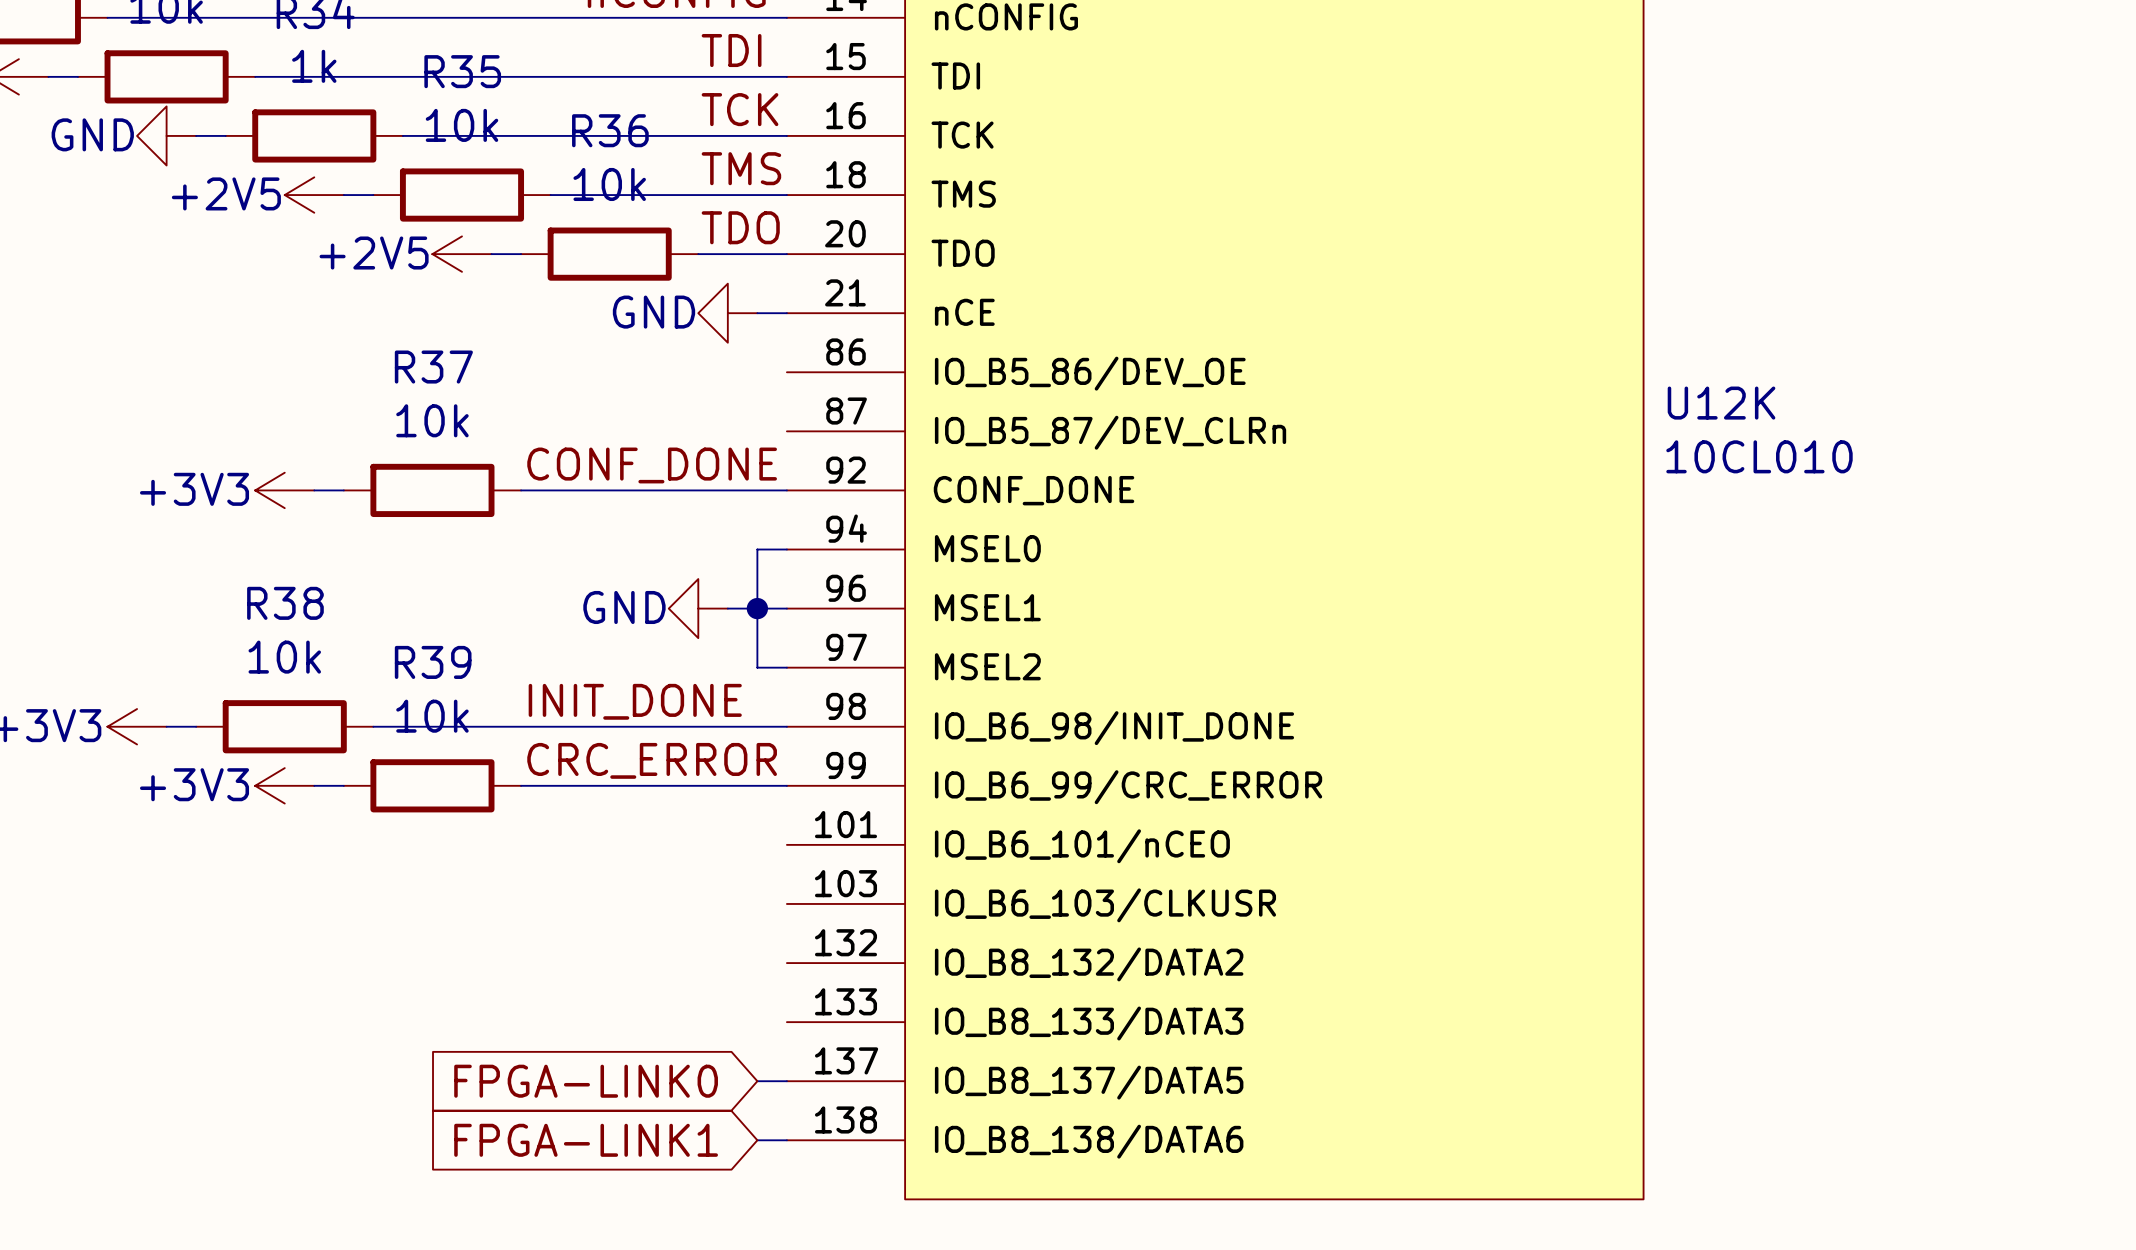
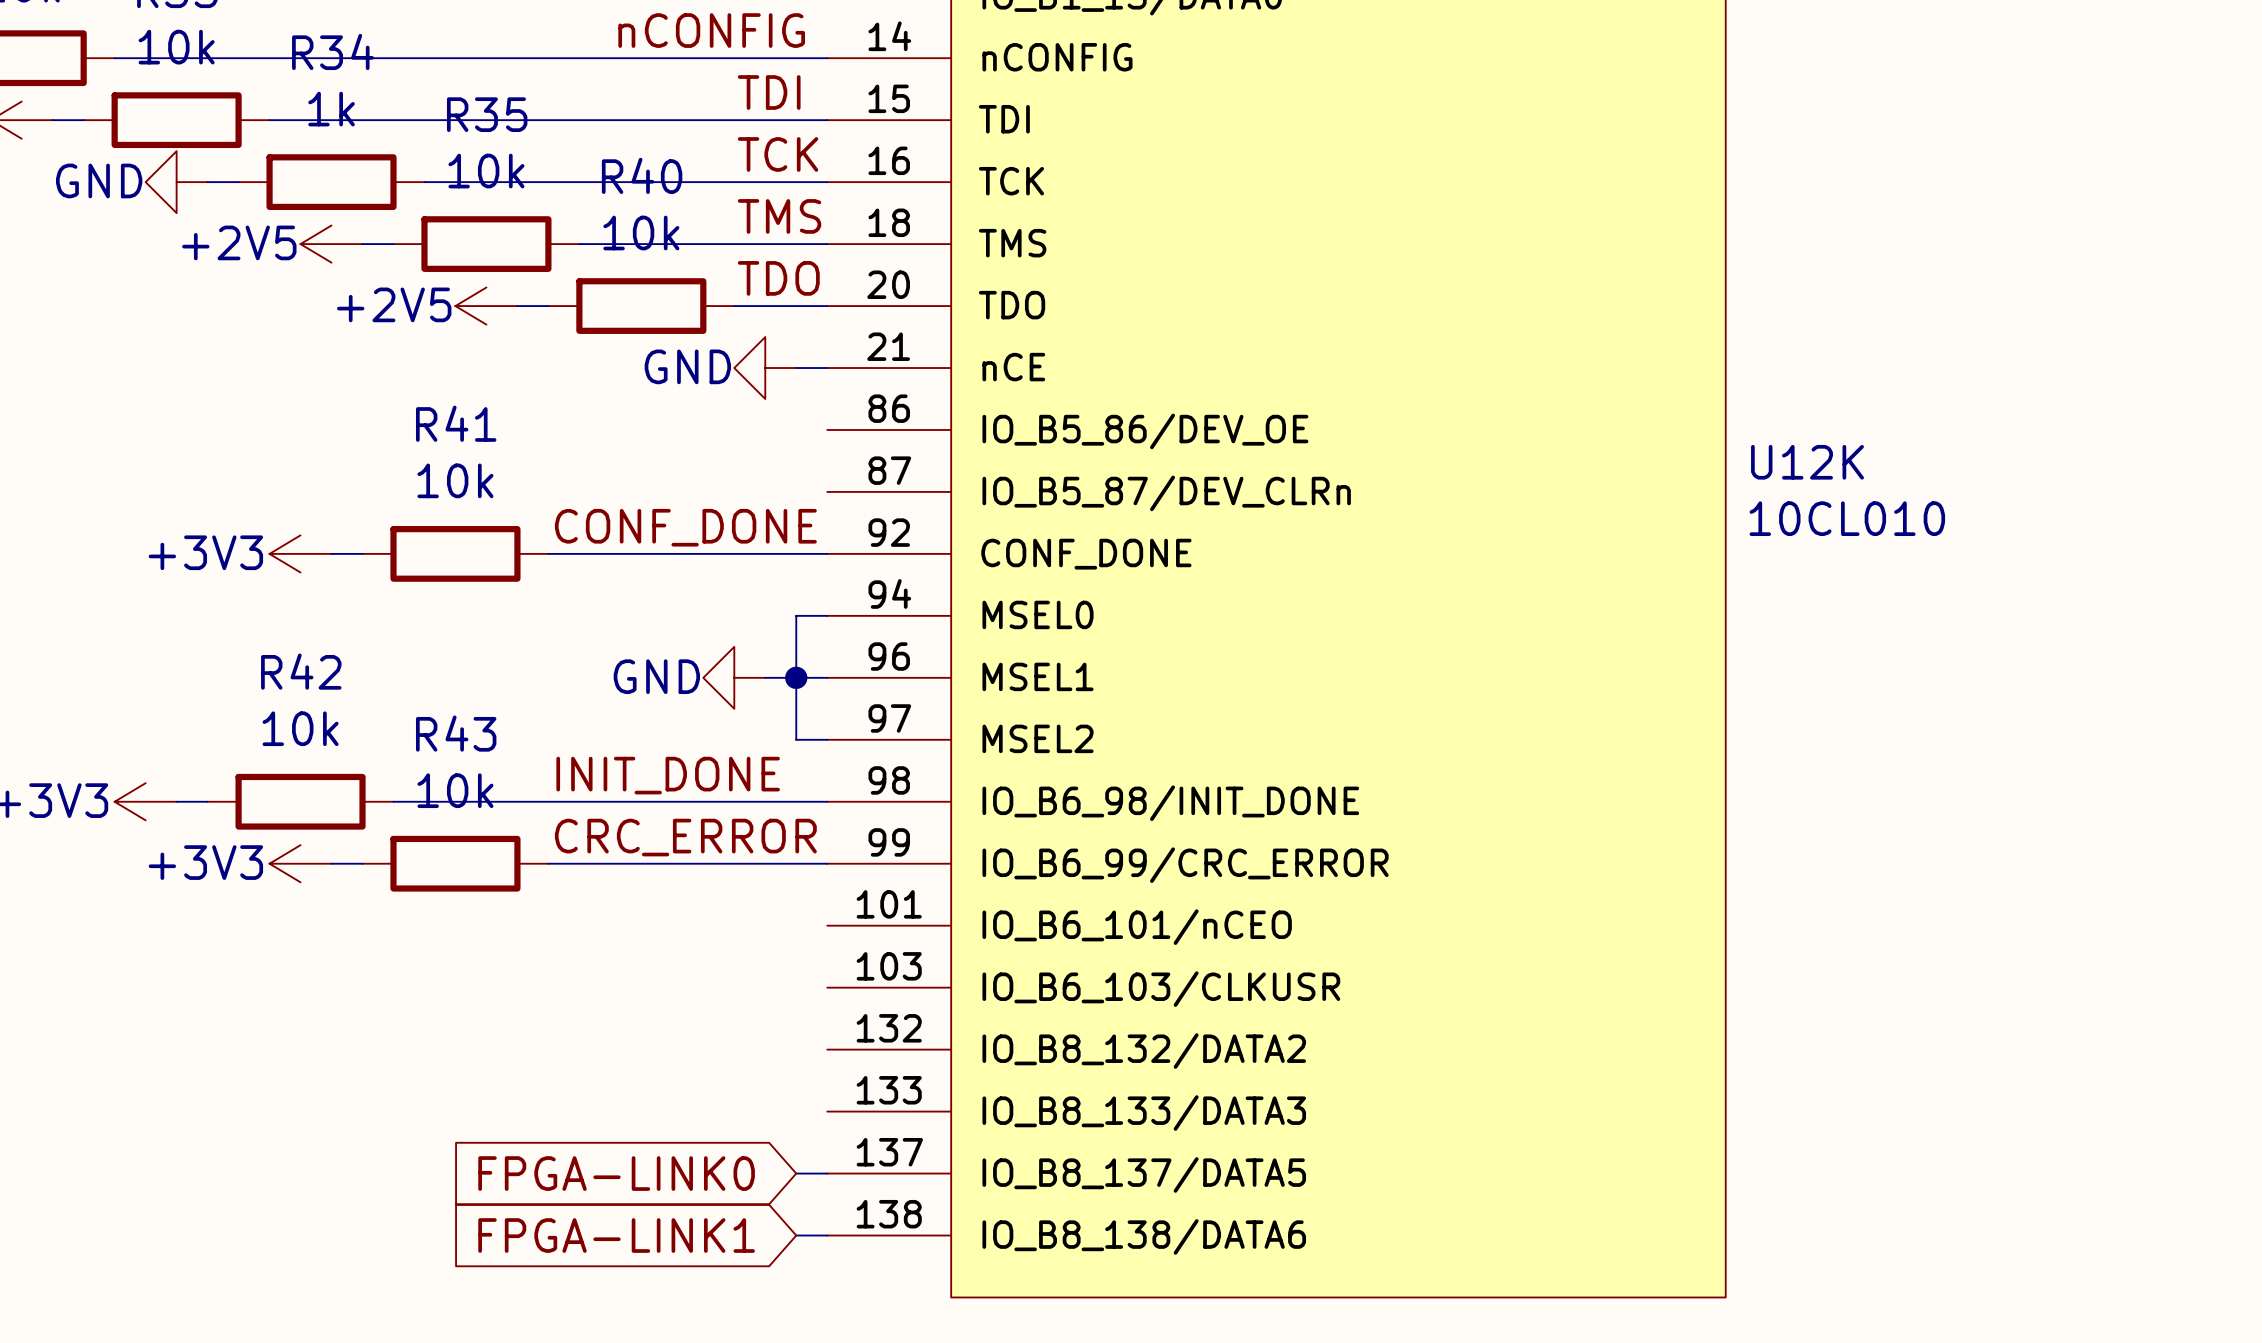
R36 name: R36 (610, 130) -> R40 (642, 175)
R37 name: R37 (433, 367) -> R41 (456, 423)
R38 name: R38 (285, 603) -> R42 (301, 671)
R39 name: R39 (433, 662) -> R43 (456, 733)

